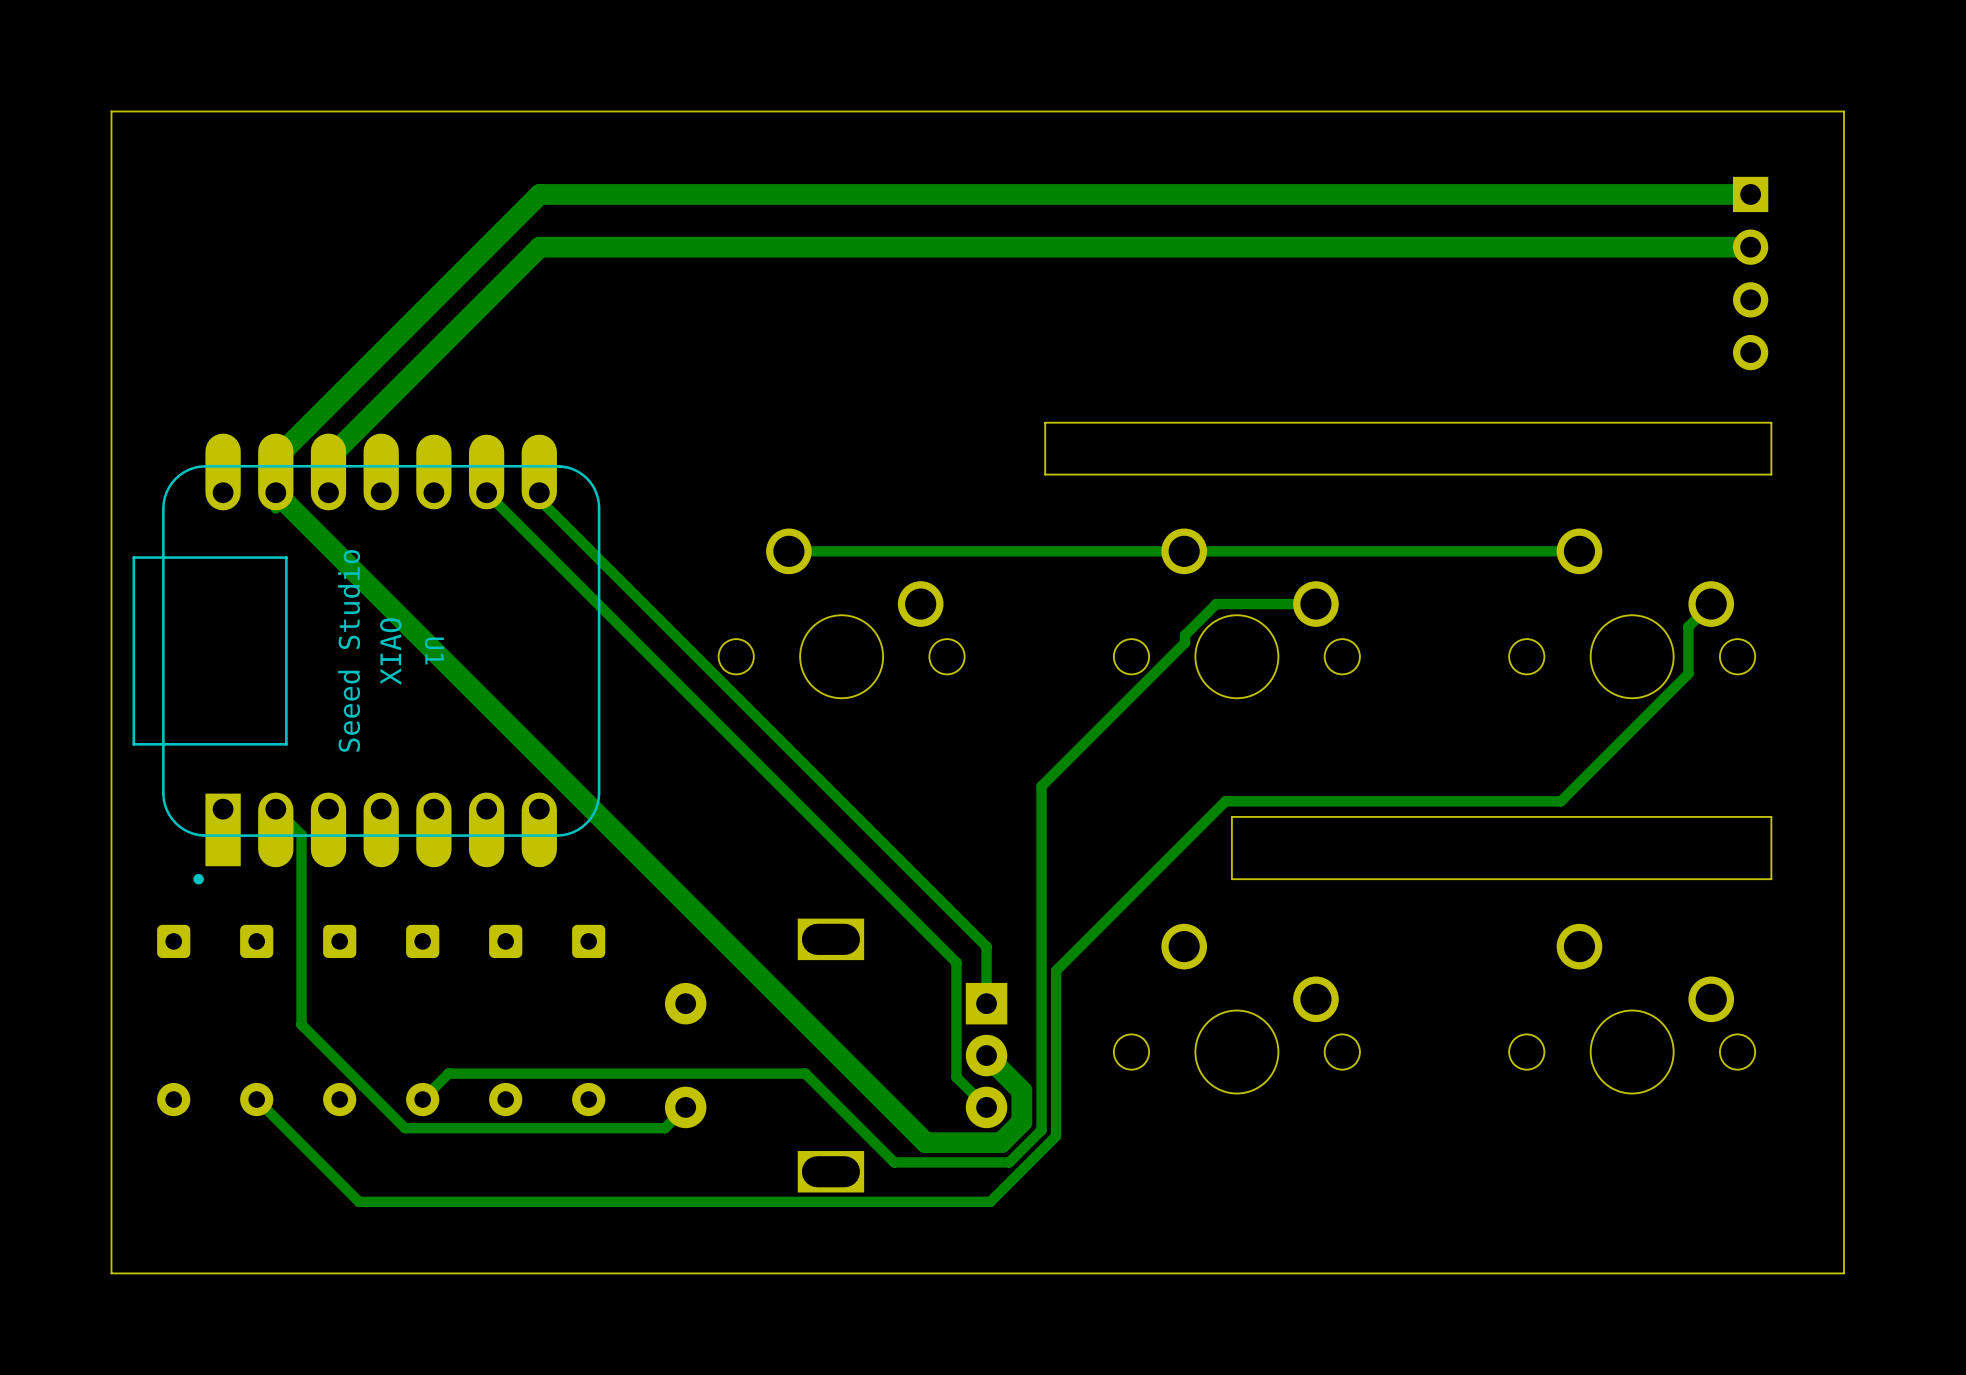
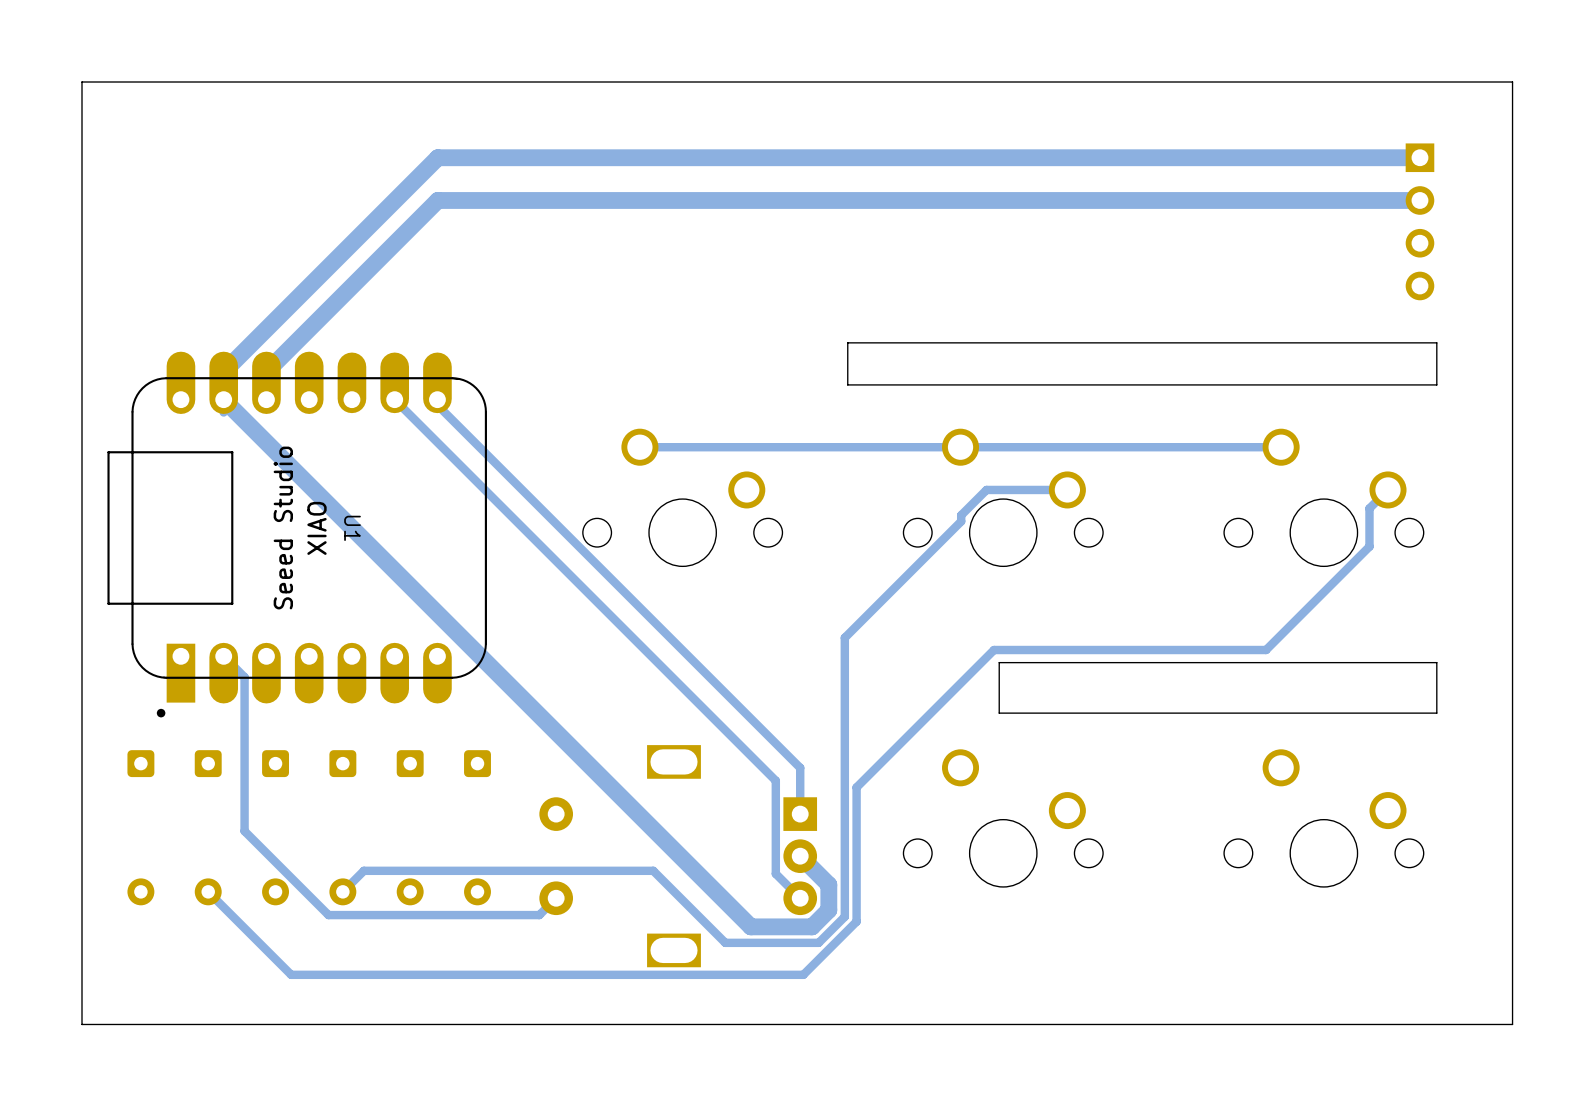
board edge: (1844, 111) (111, 111) (111, 1273) (1844, 1273) (1844, 111) -> (1512, 82) (1512, 1024) (82, 1024) (82, 82) (1512, 82)

